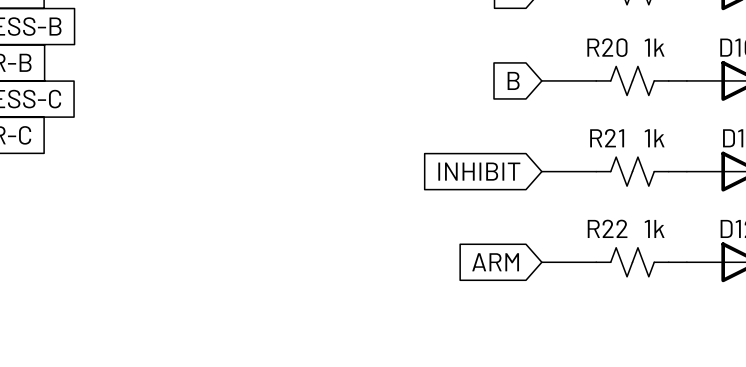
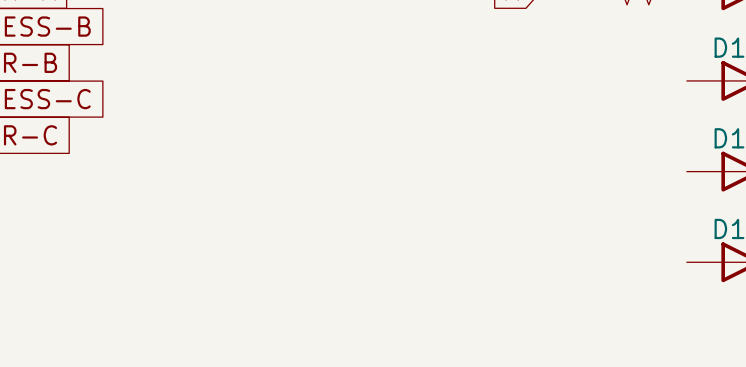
global label: B (513, 80) -> none
wire: (541, 80) (596, 80) -> none
R20: 1k (632, 80) -> none
wire: (668, 80) (686, 80) -> none
global label: INHIBIT (479, 171) -> none
wire: (541, 171) (596, 171) -> none
R21: 1k (632, 171) -> none
wire: (668, 171) (686, 171) -> none
global label: ARM (495, 262) -> none
wire: (541, 262) (596, 262) -> none
R22: 1k (632, 262) -> none
wire: (668, 262) (686, 262) -> none

